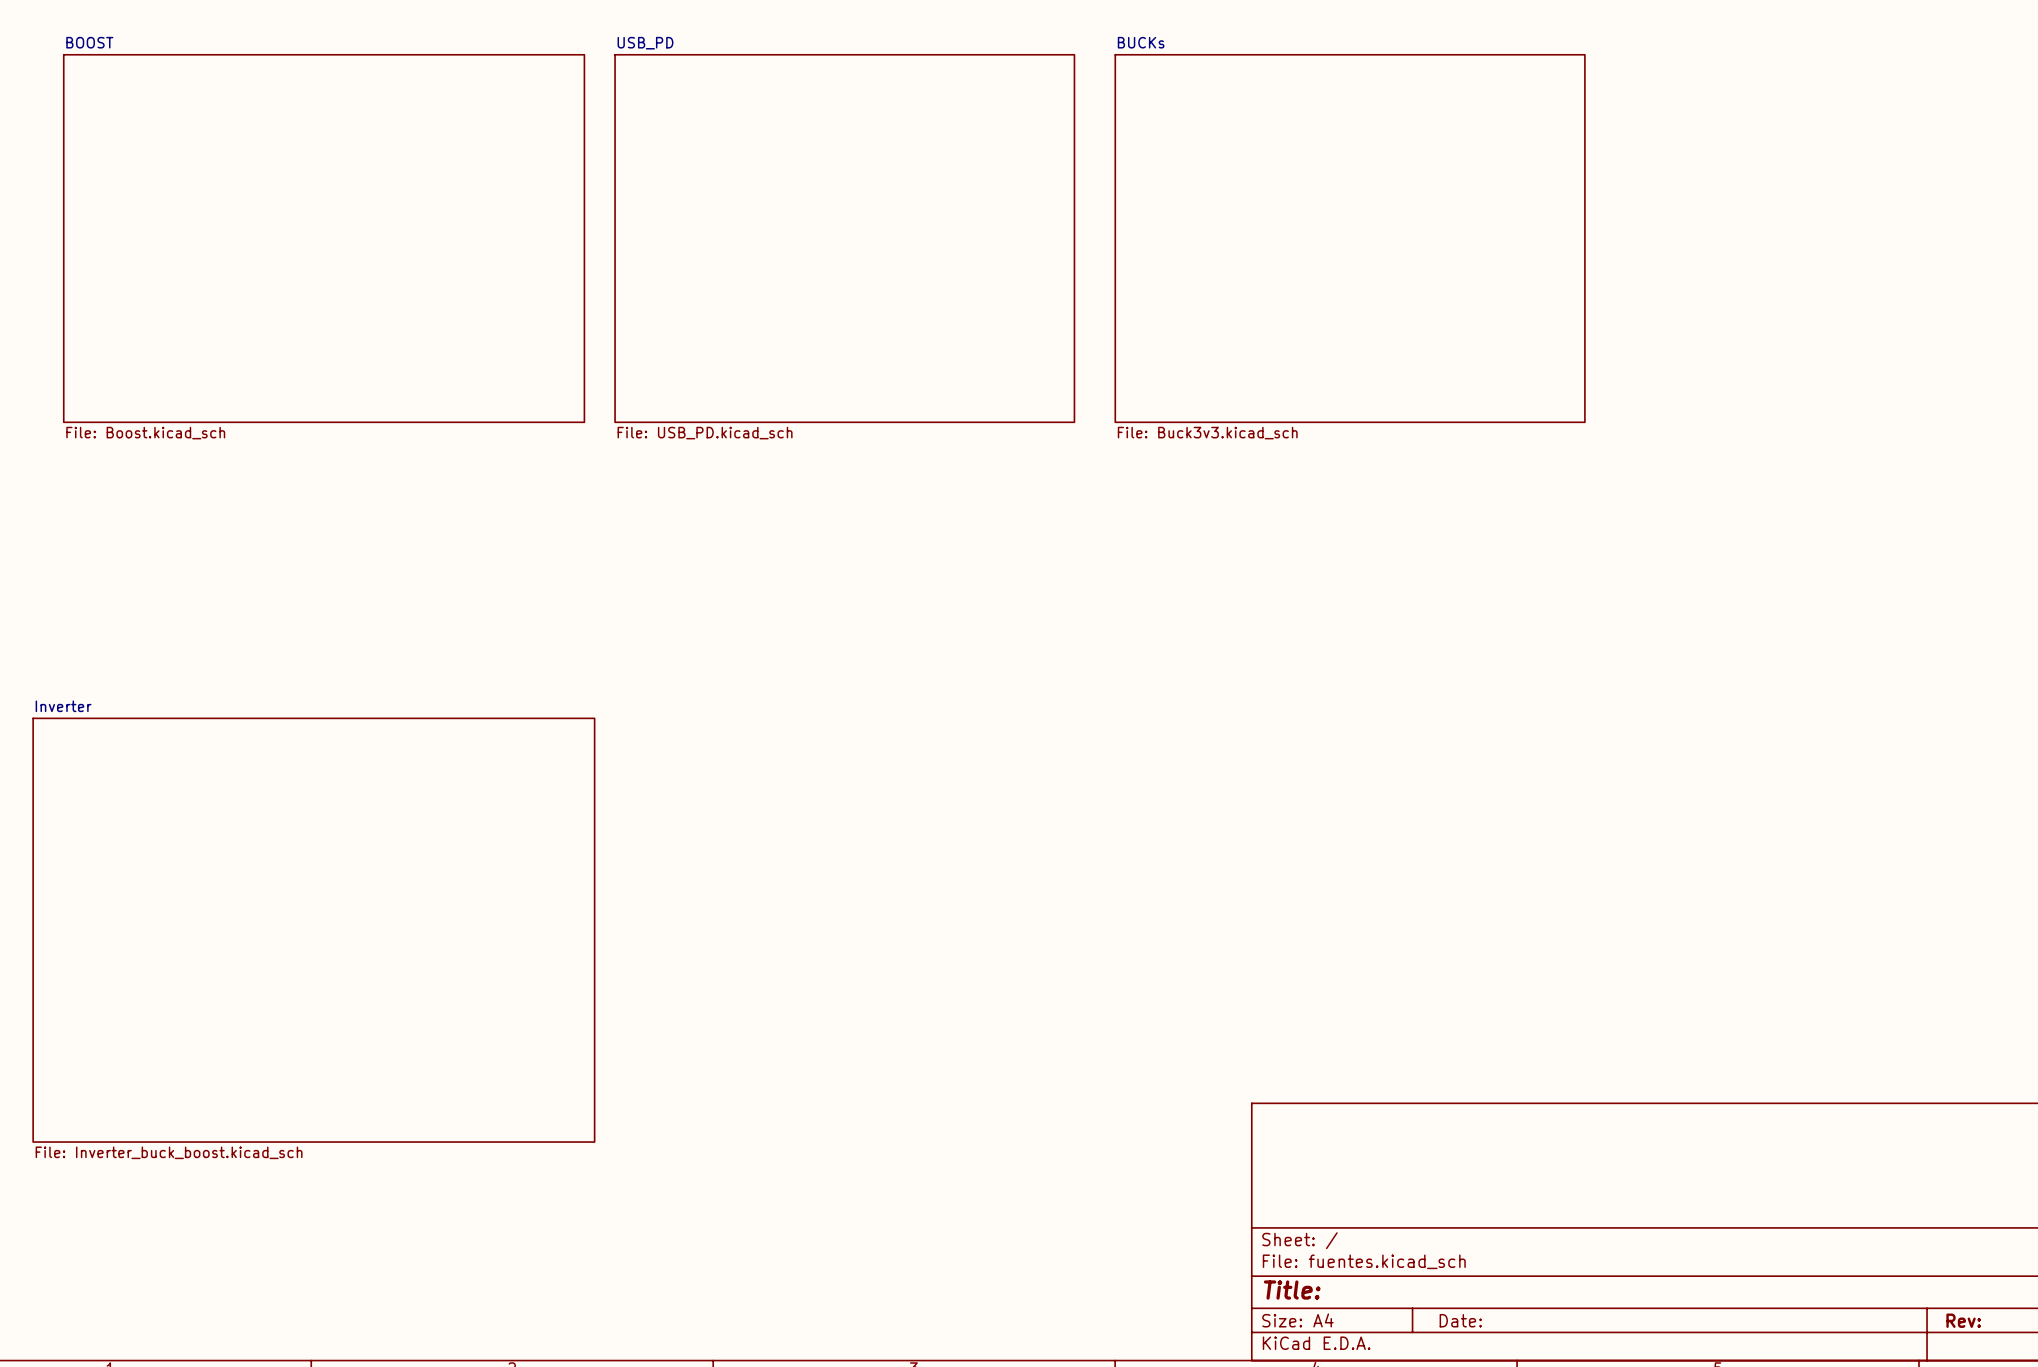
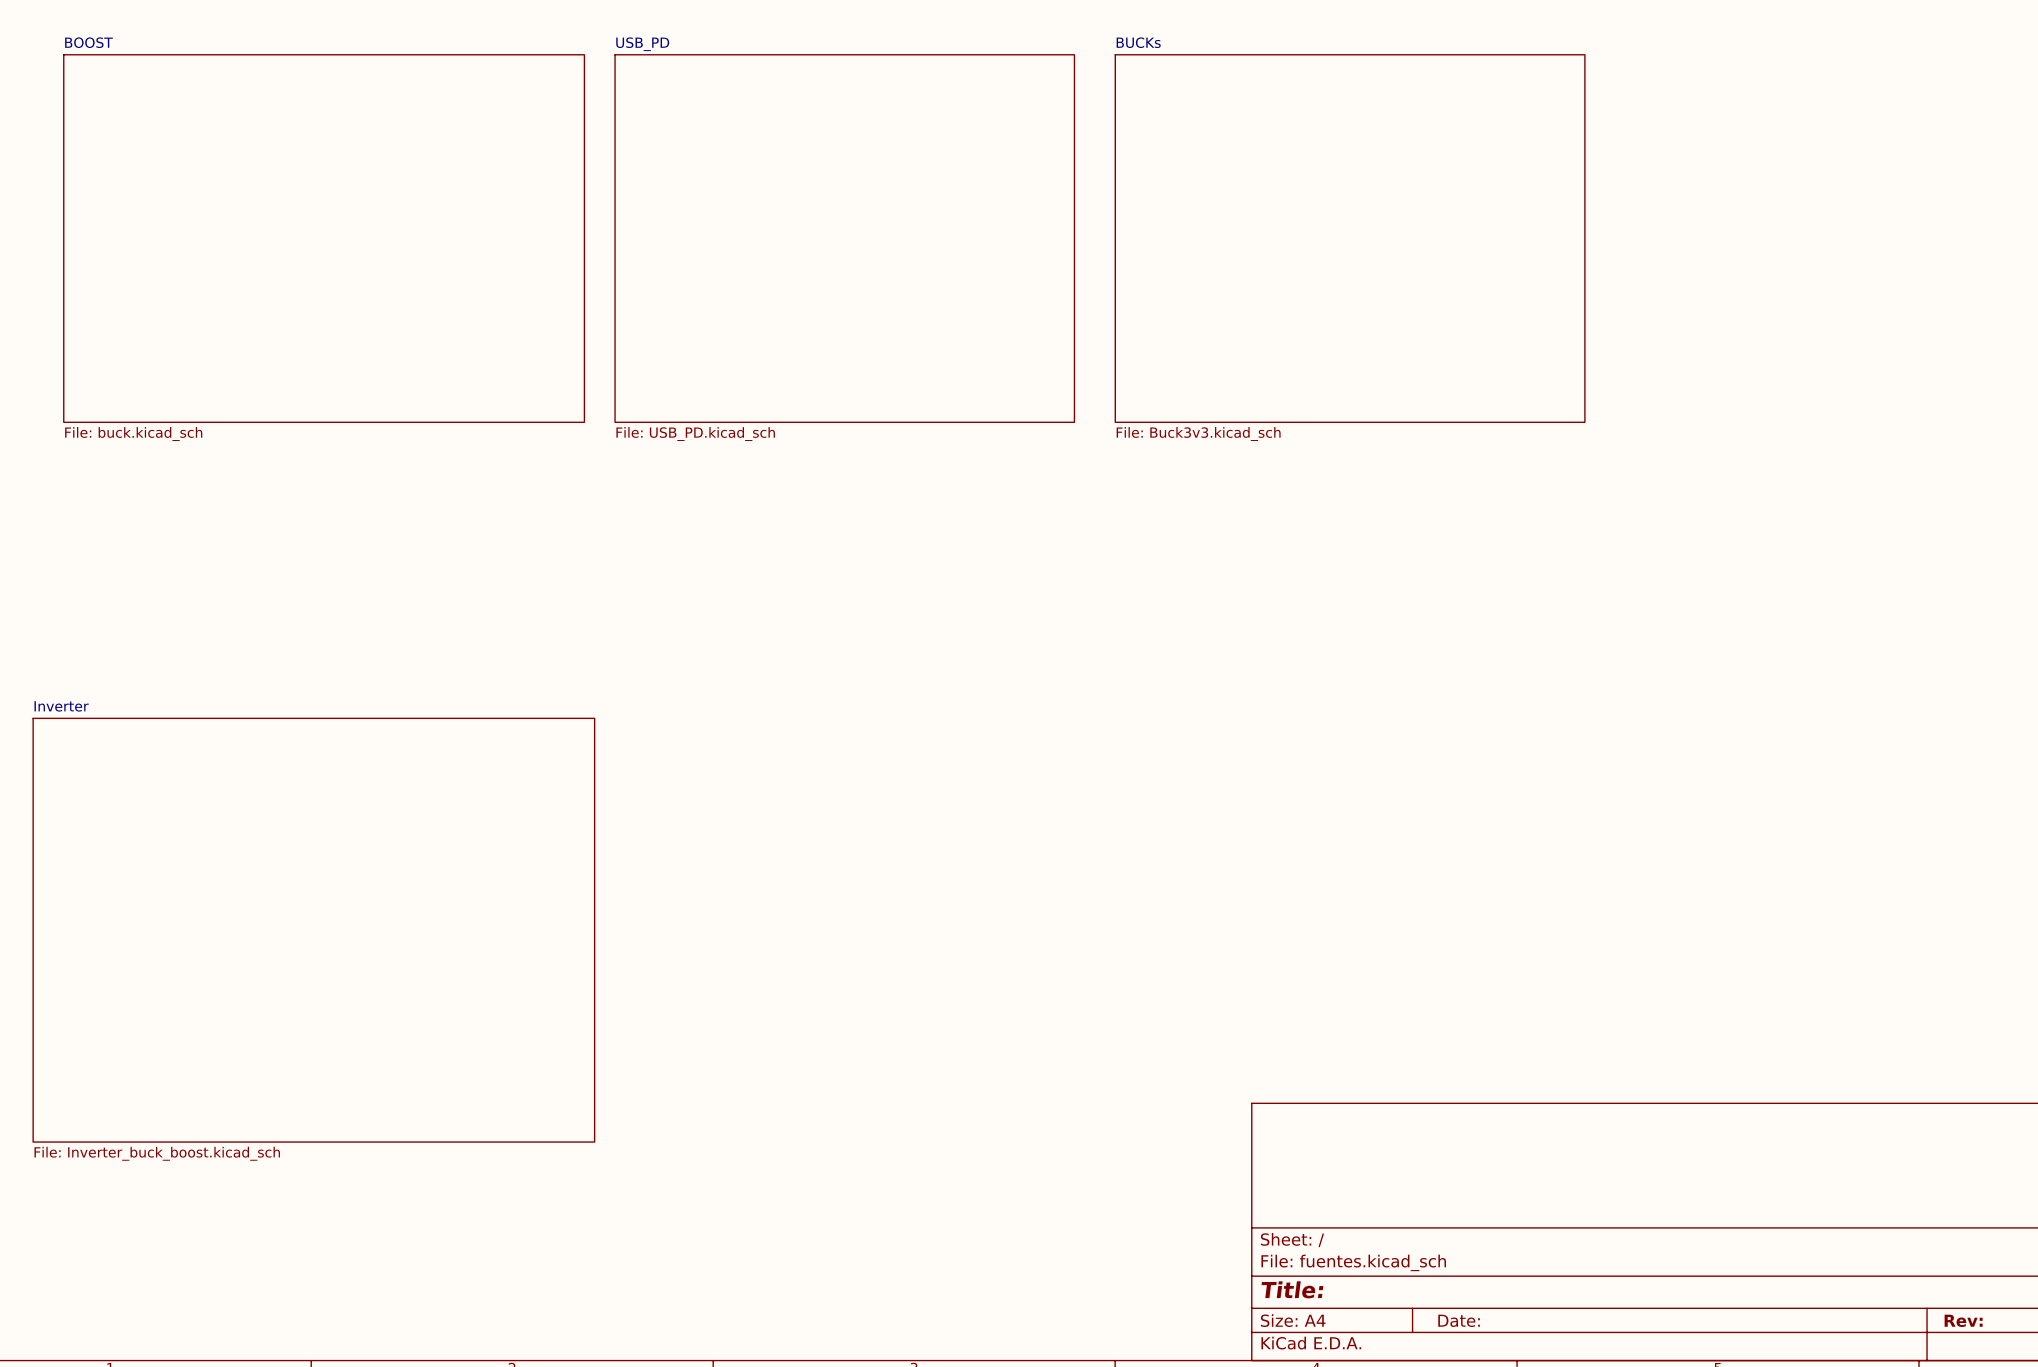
sheet BOOST value: File: Boost.kicad_sch (145, 433) -> File: buck.kicad_sch (133, 434)

